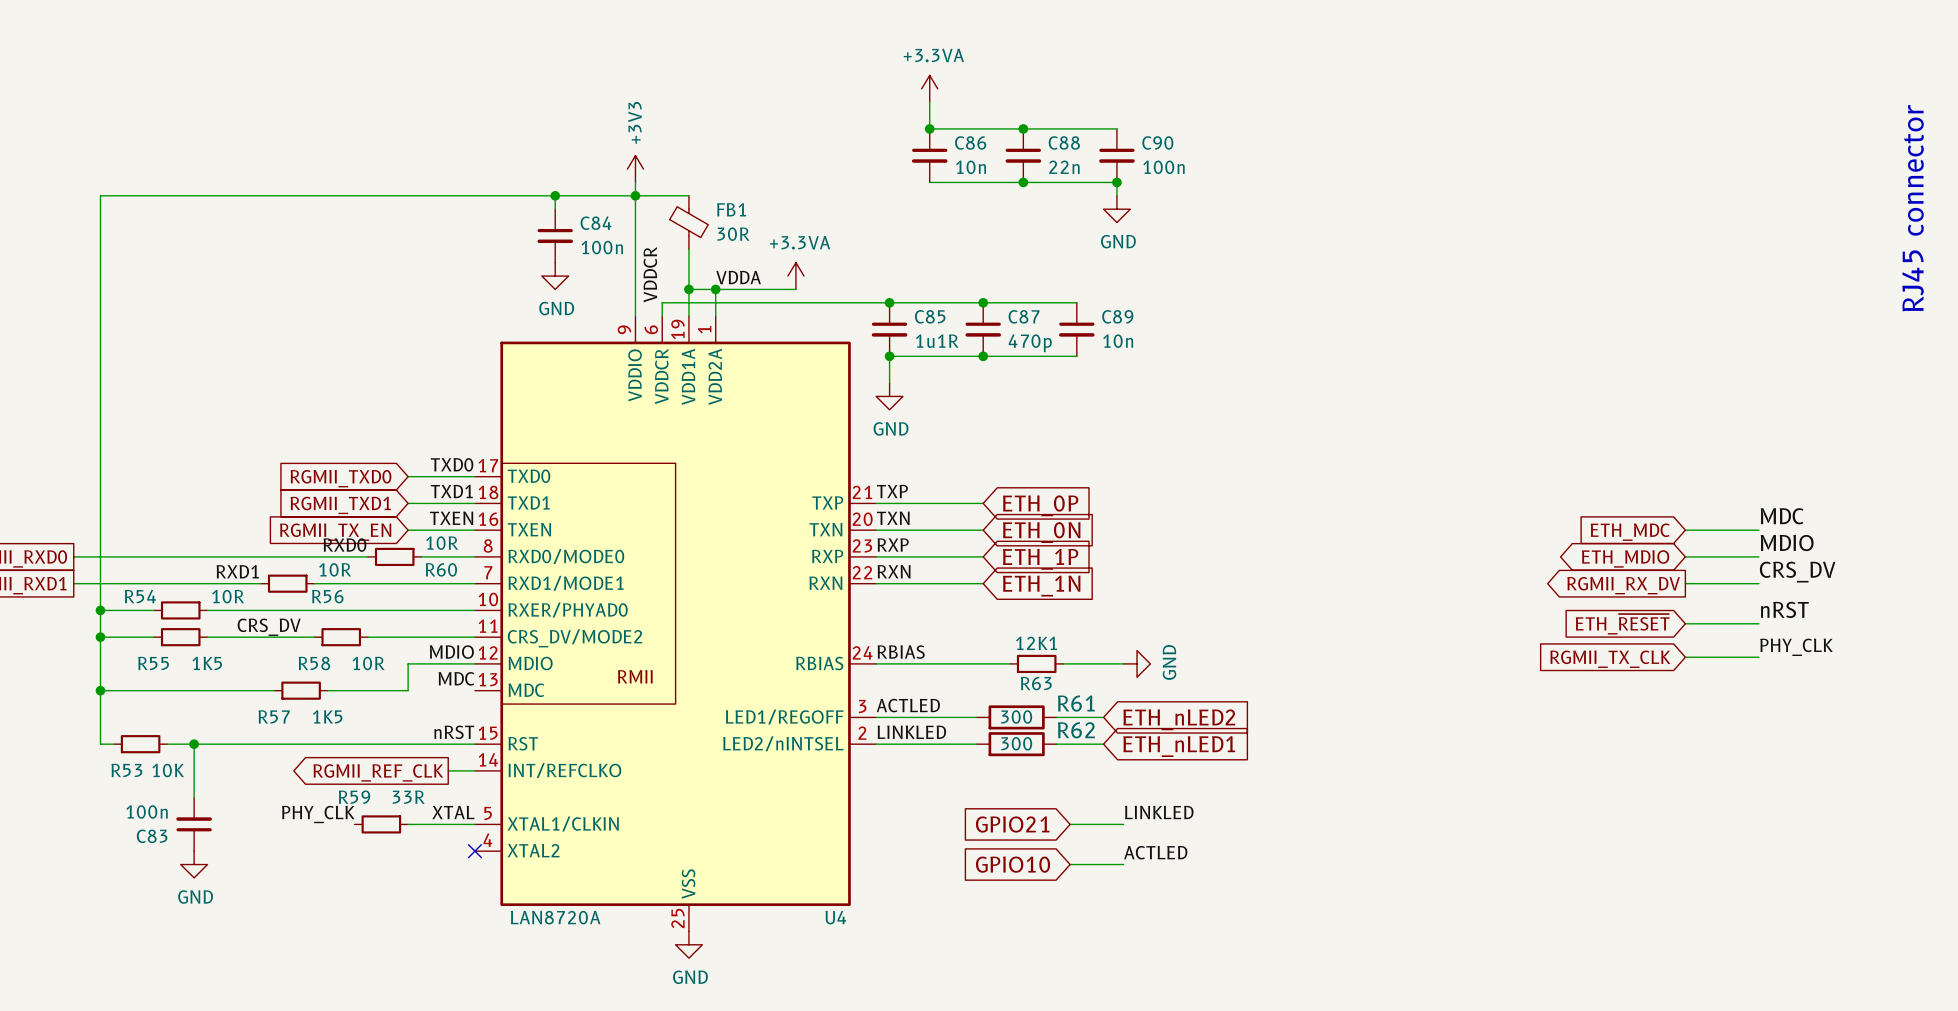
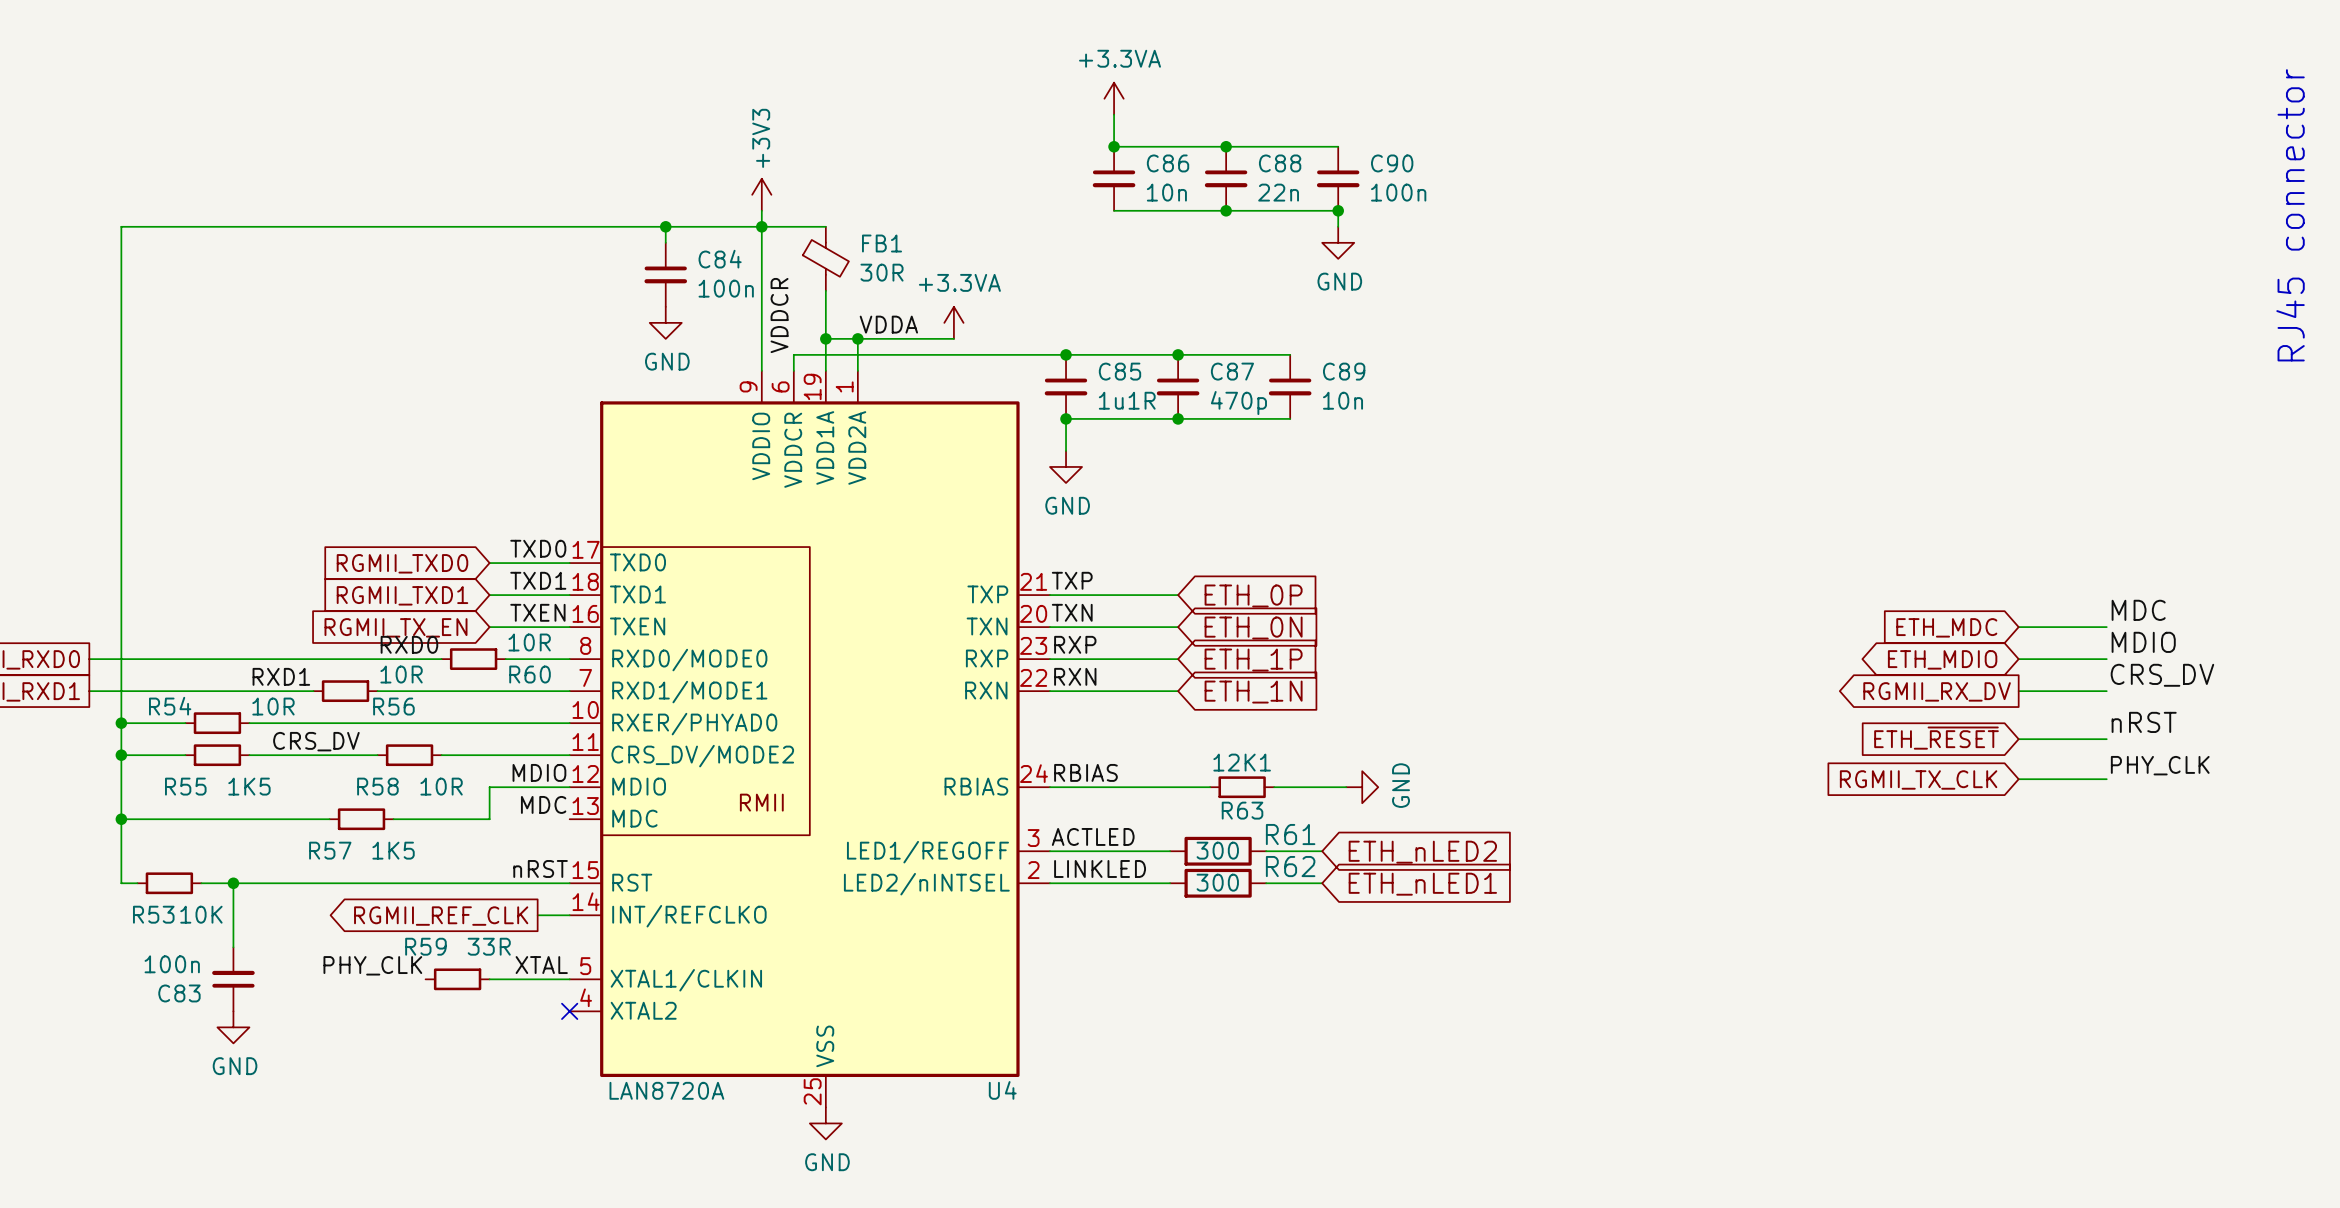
label: LINKLED (1159, 812) -> none
global label: GPIO21 (1012, 824) -> none
wire: (1070, 824) (1123, 824) -> none
label: ACTLED (1155, 852) -> none
global label: GPIO10 (1013, 864) -> none
wire: (1070, 864) (1123, 864) -> none

